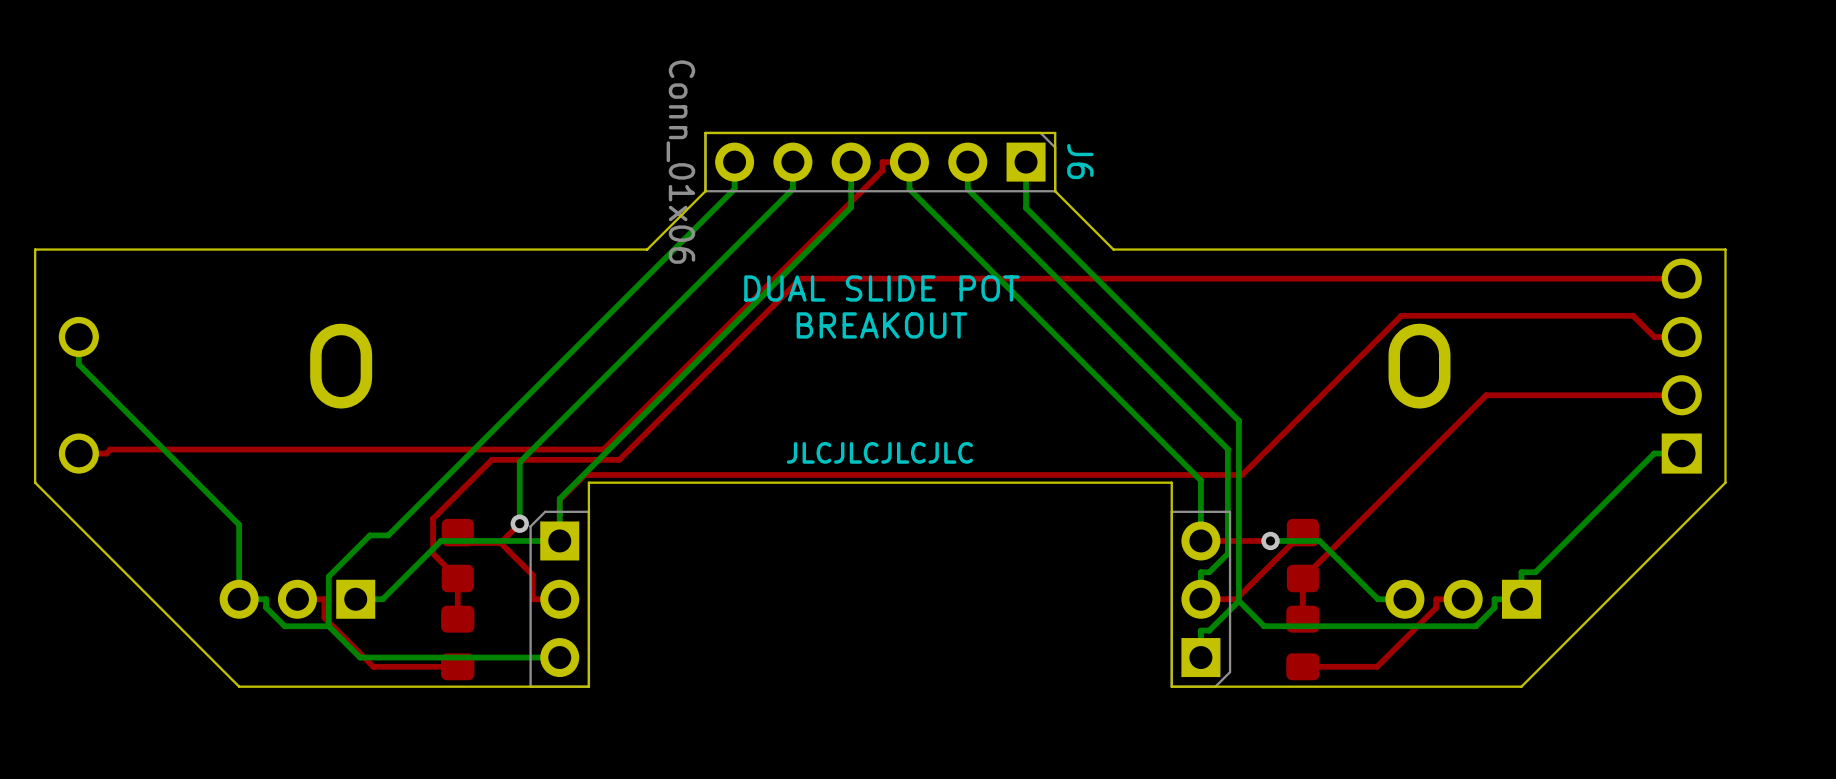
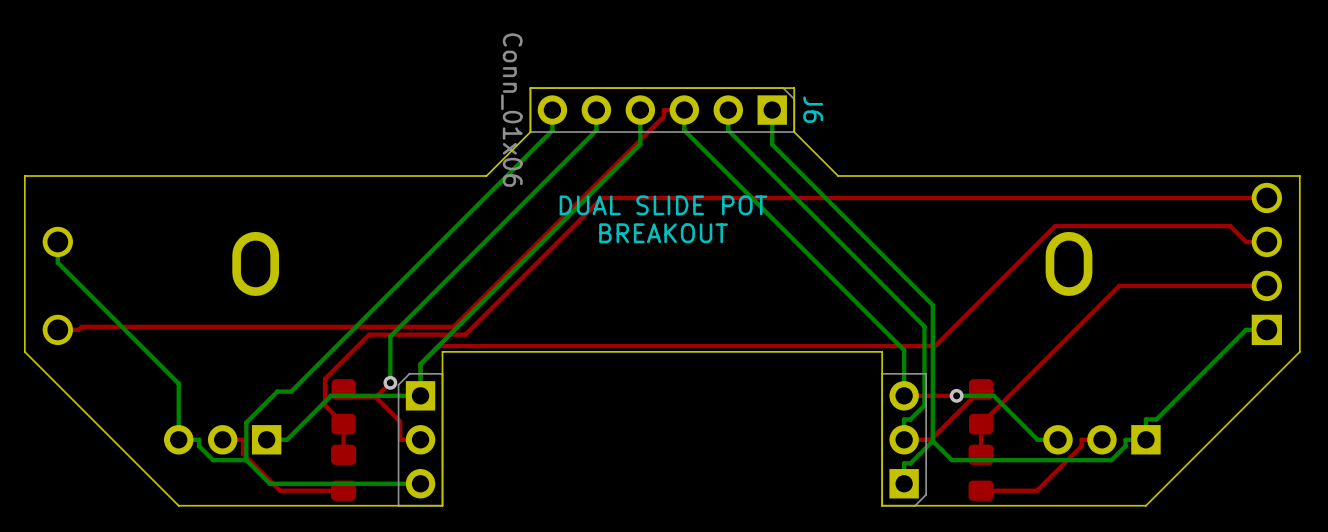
text: JLCJLCJLCJLC (879, 452) -> none

